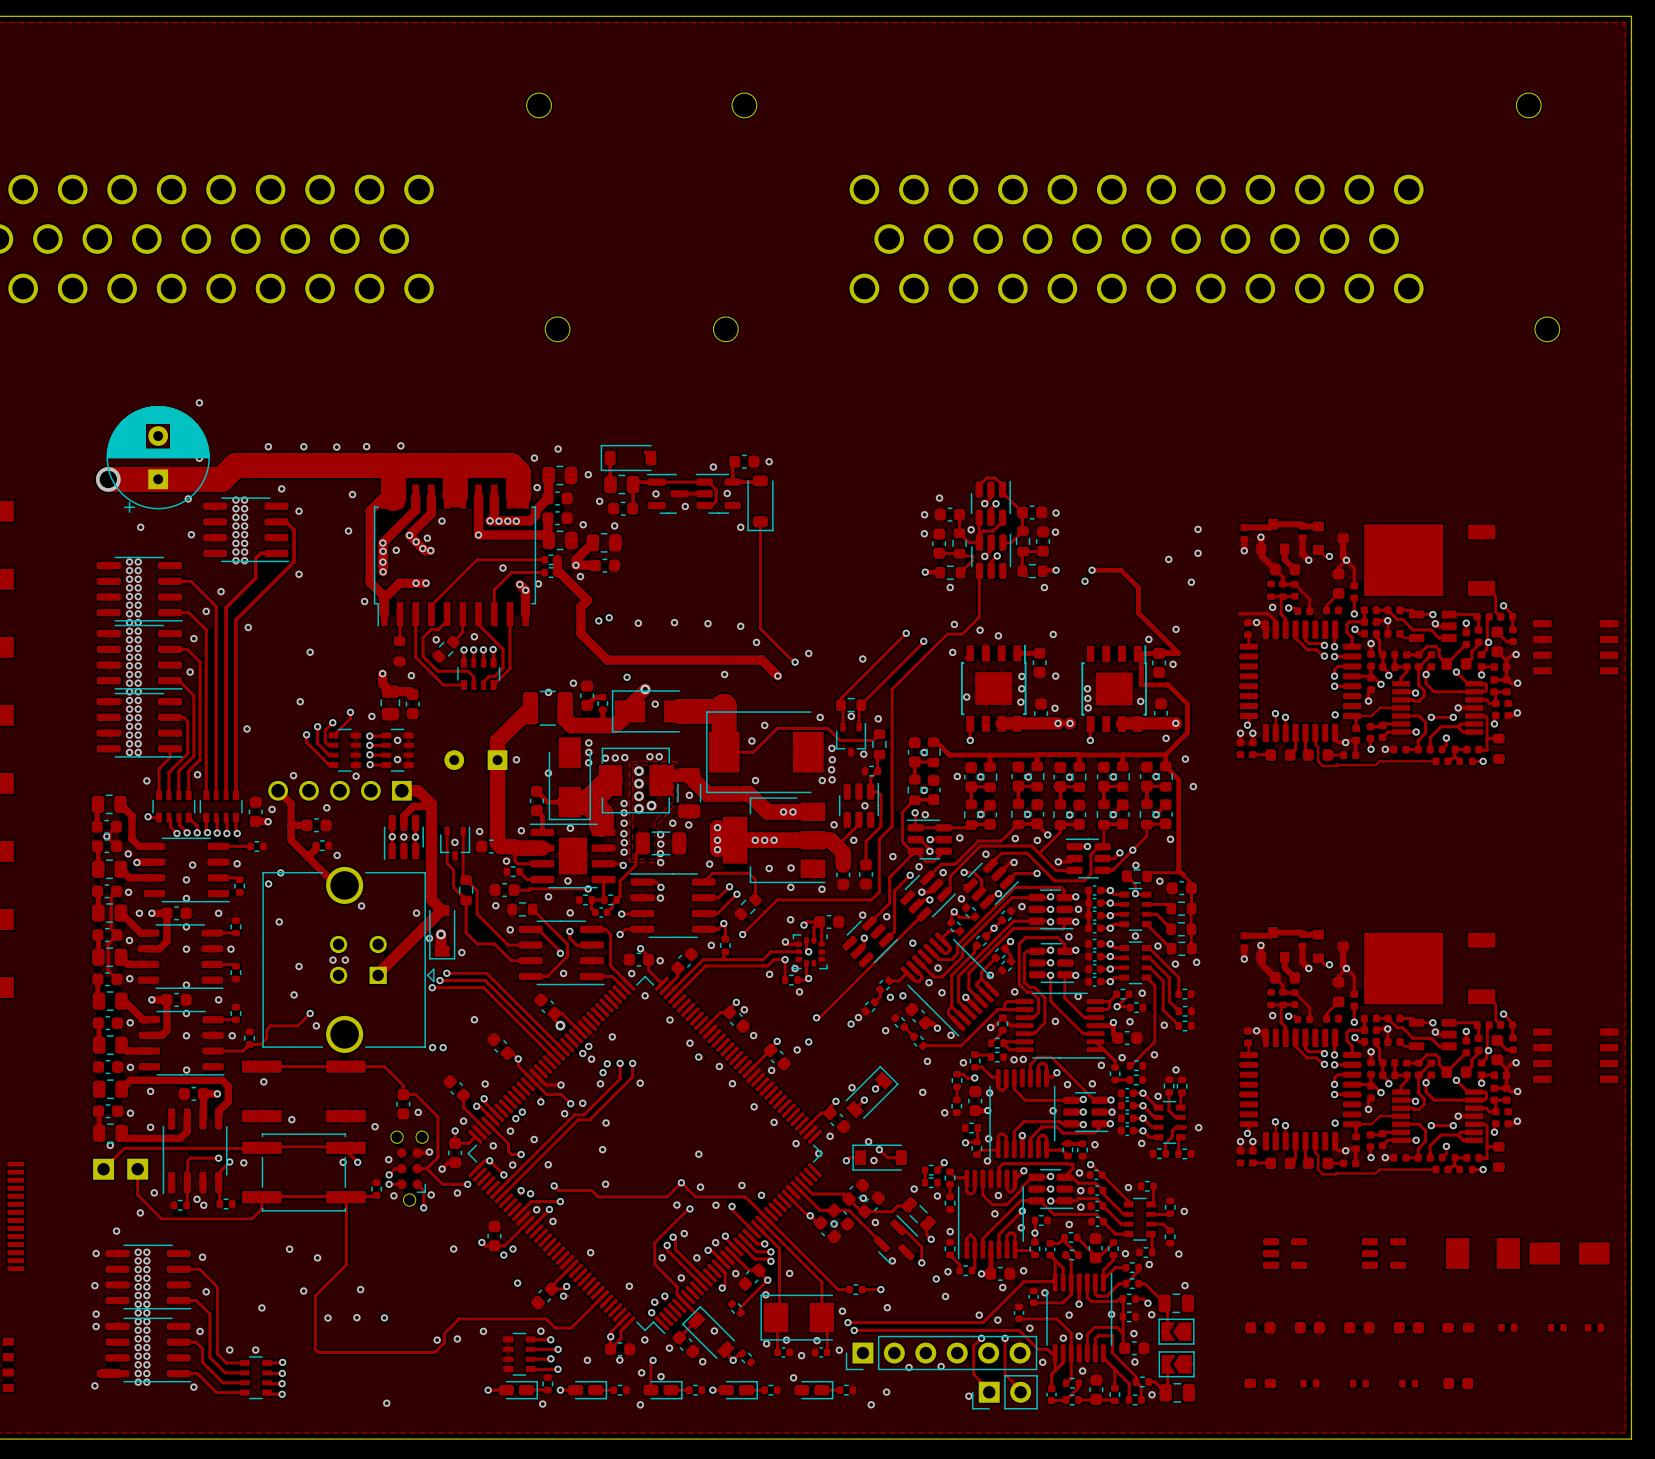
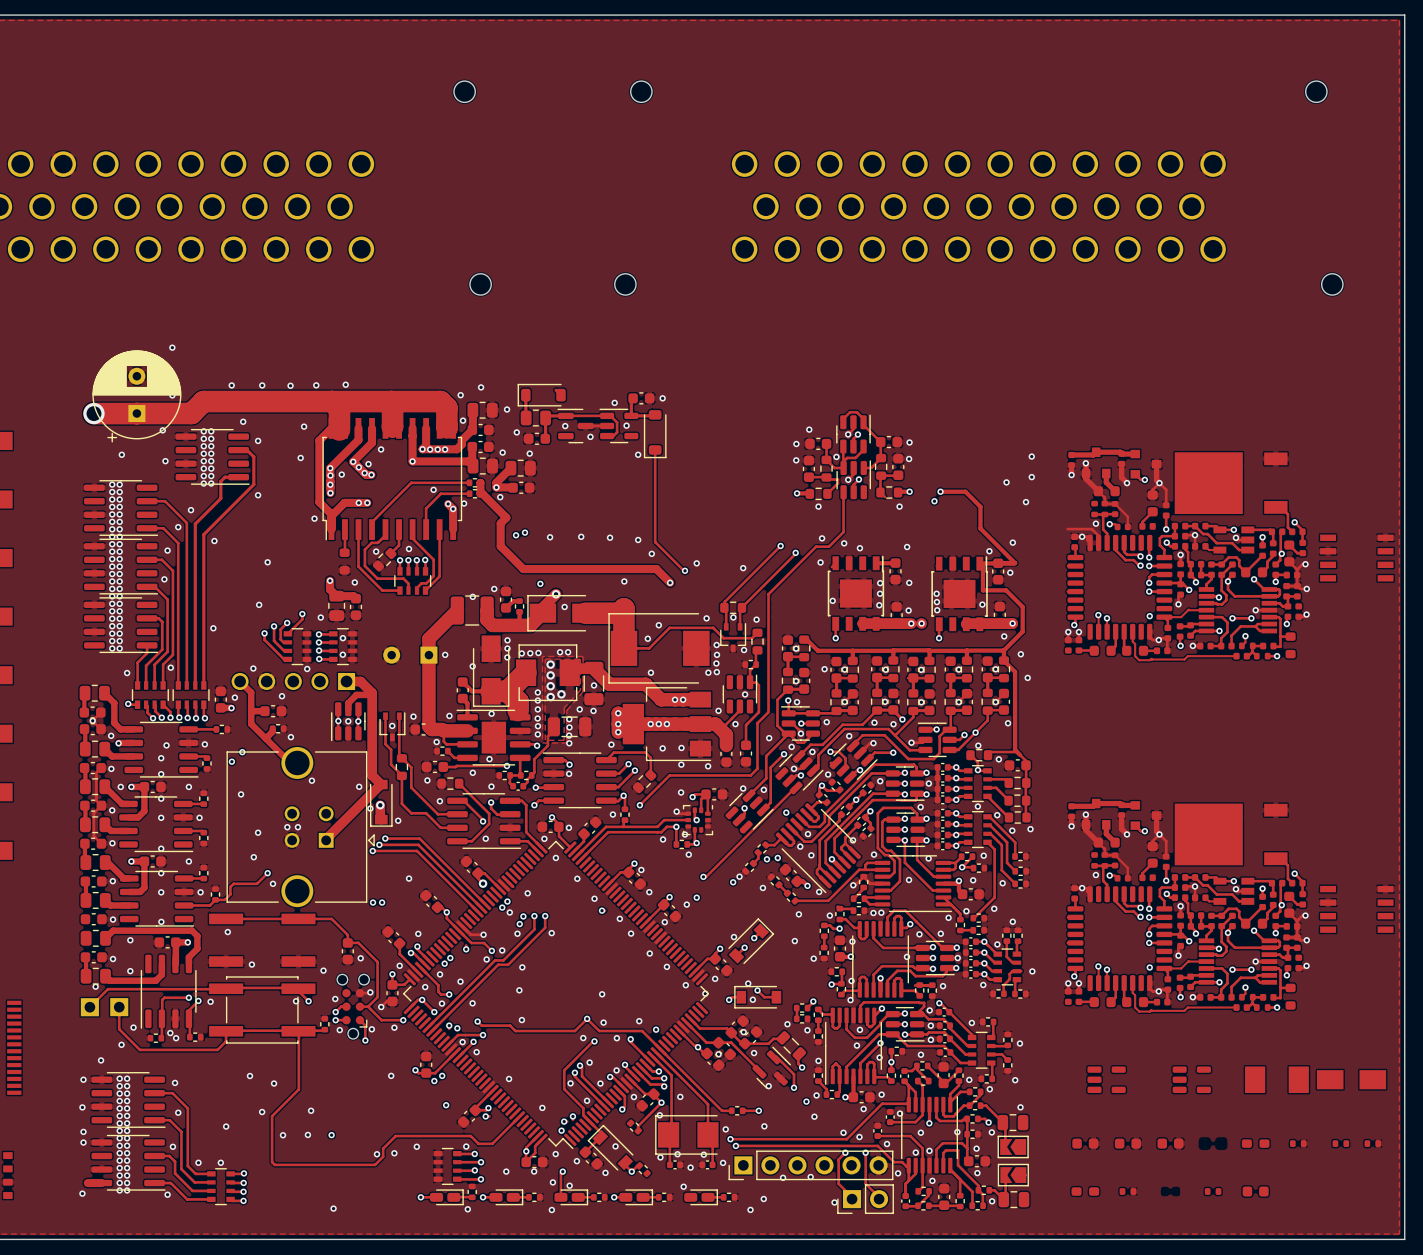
part: (1408, 1327) -> none
part: (1359, 1383) -> none

